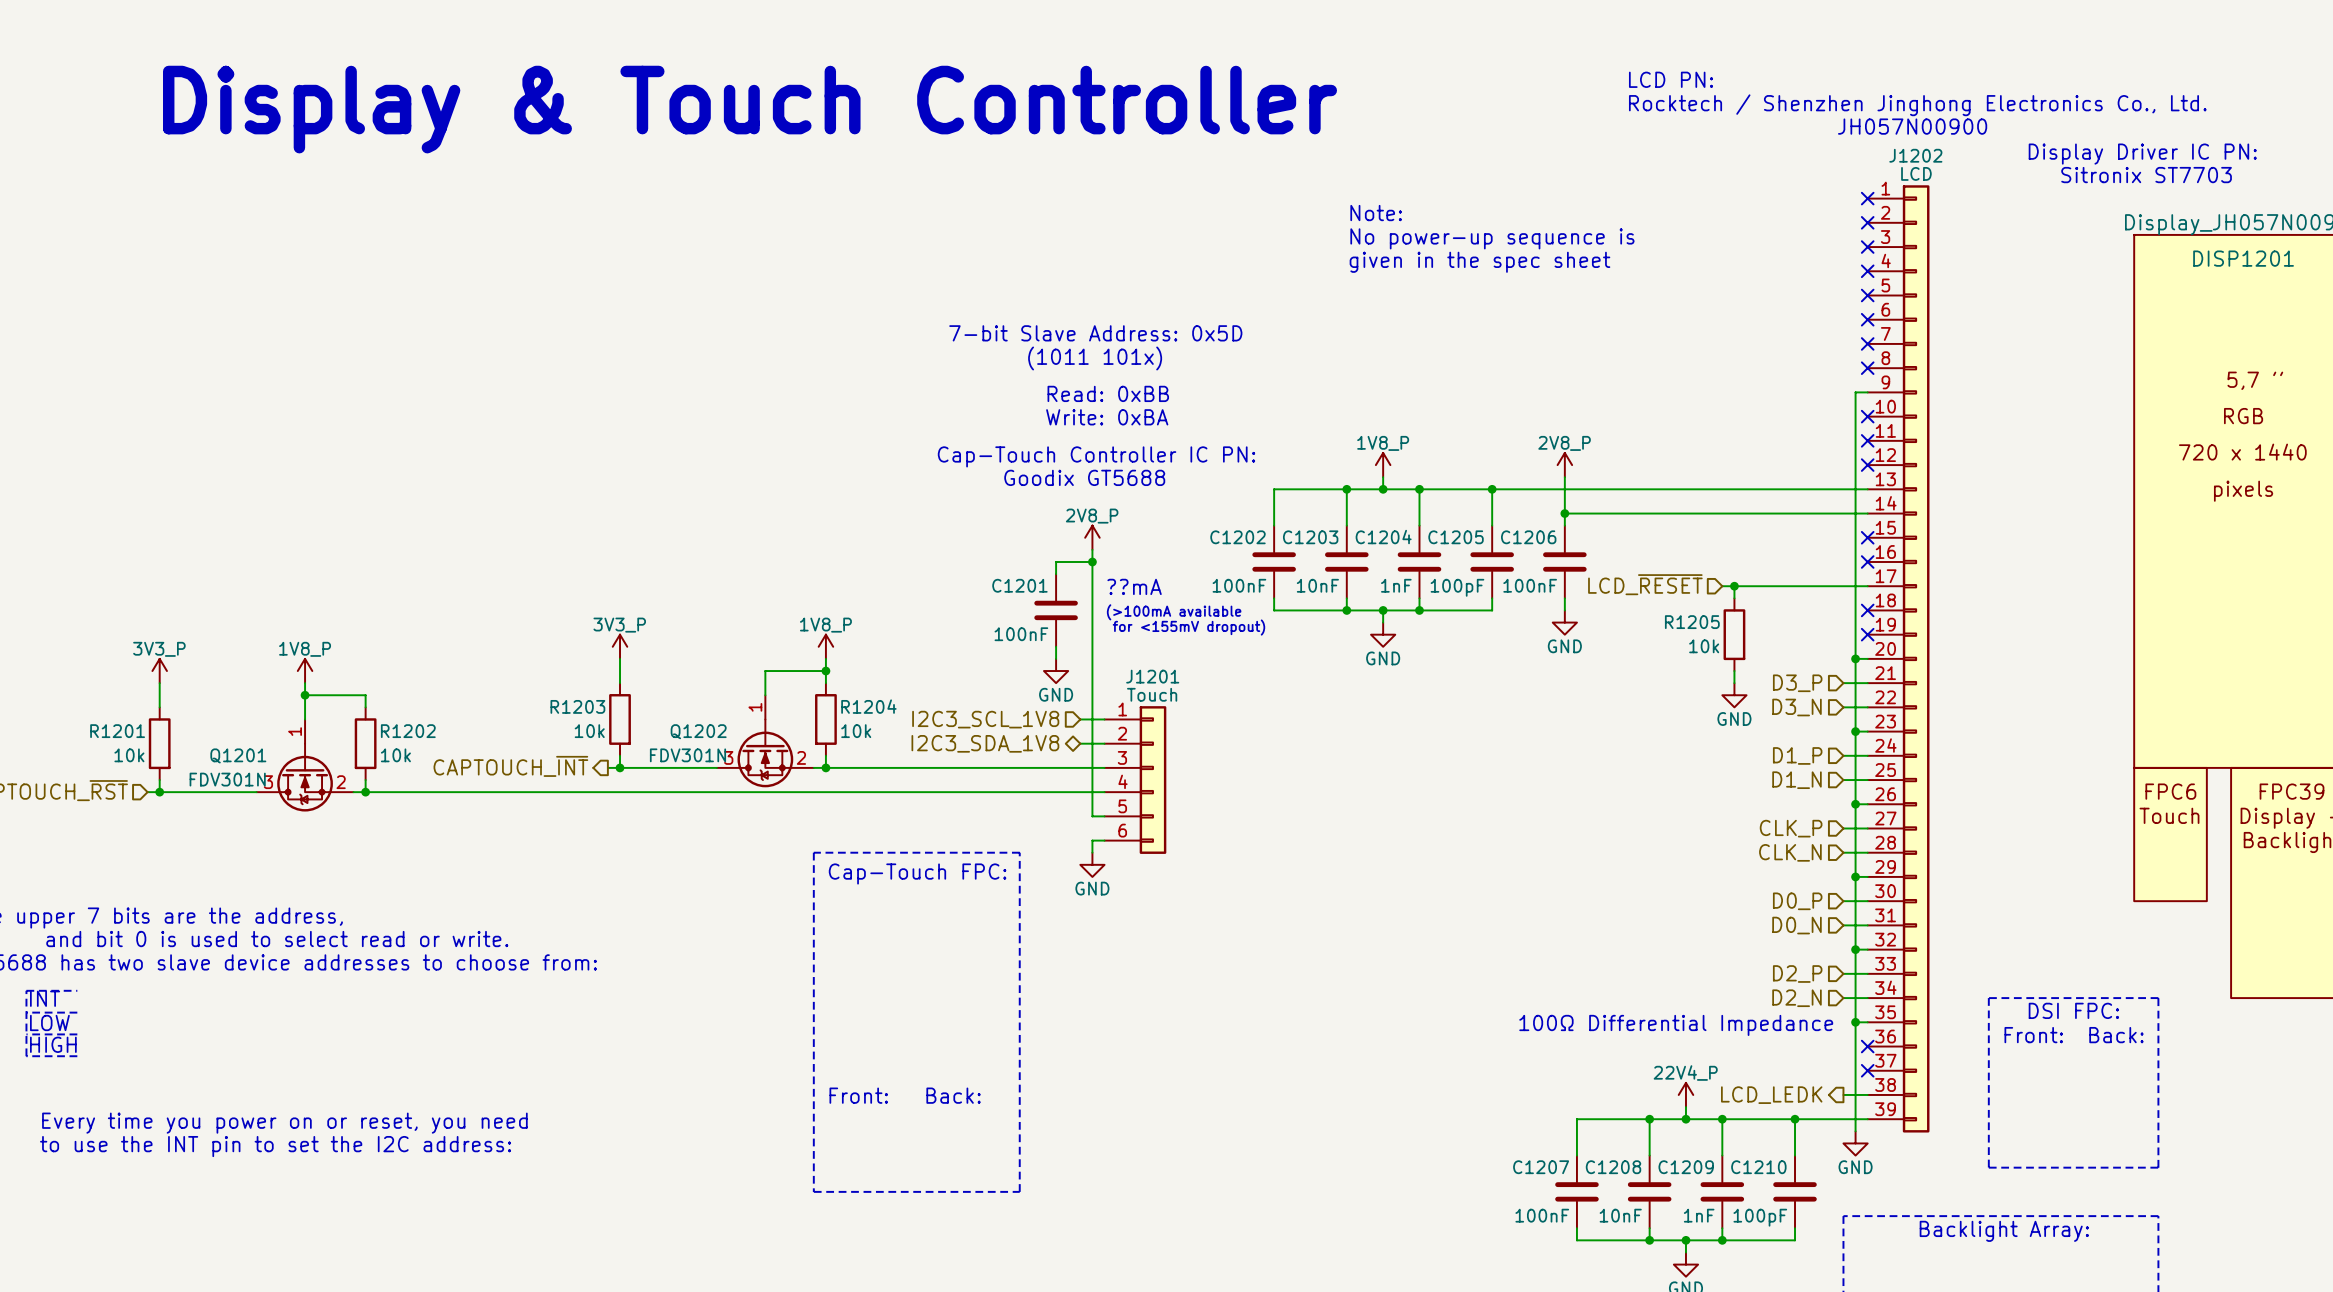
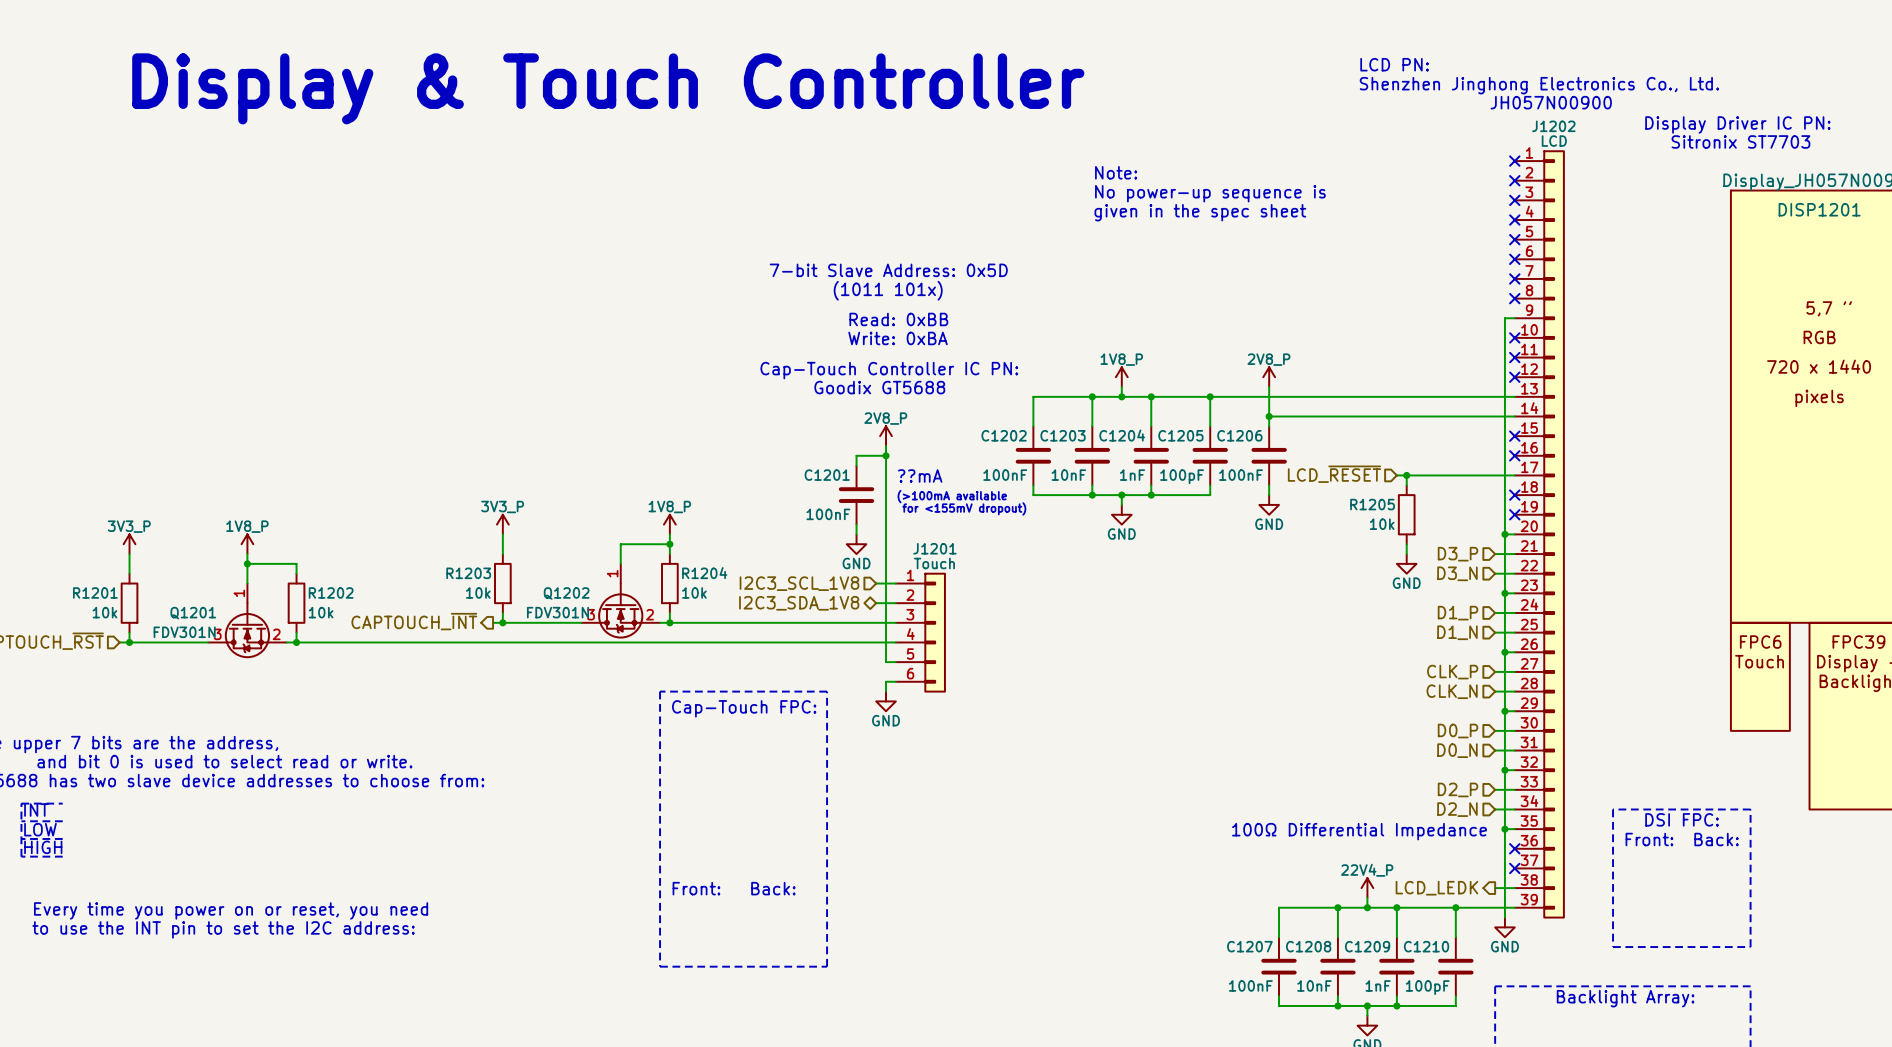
text position: LCD PN: (1671, 79) -> LCD PN: (1394, 64)
text: Rocktech / Shenzhen Jinghong Electronics Co., Ltd. (1917, 105) -> Shenzhen Jinghong Electronics Co., Ltd. (1539, 85)

